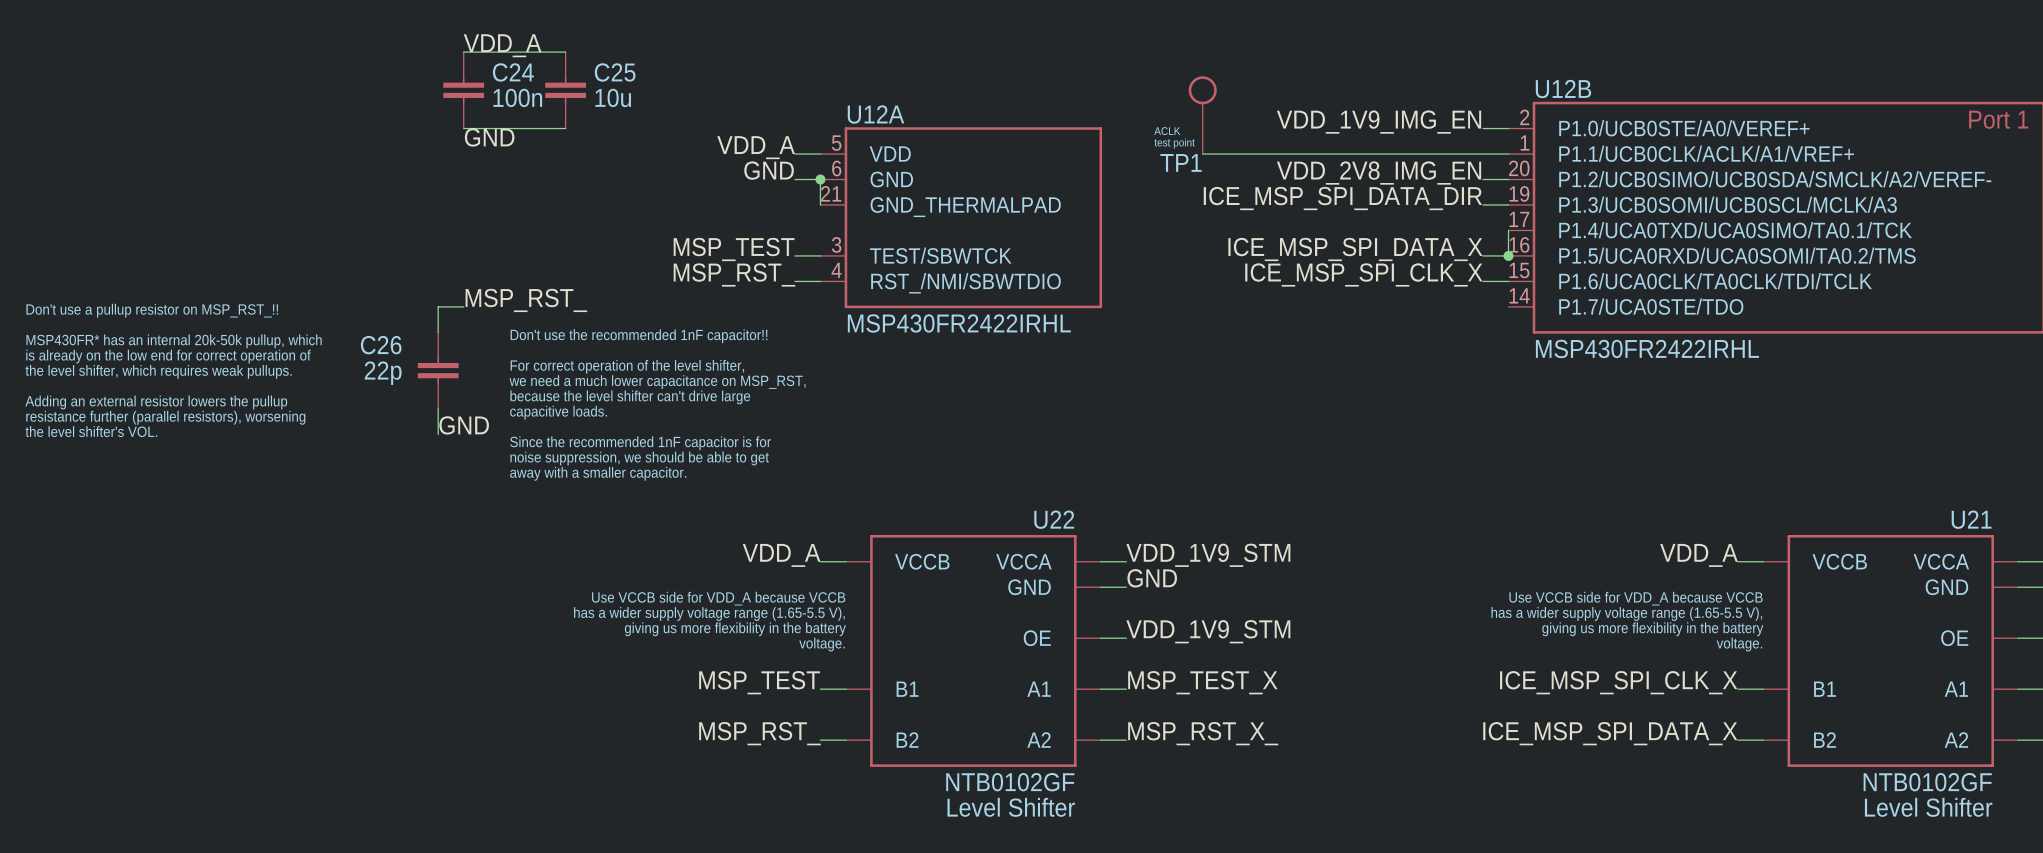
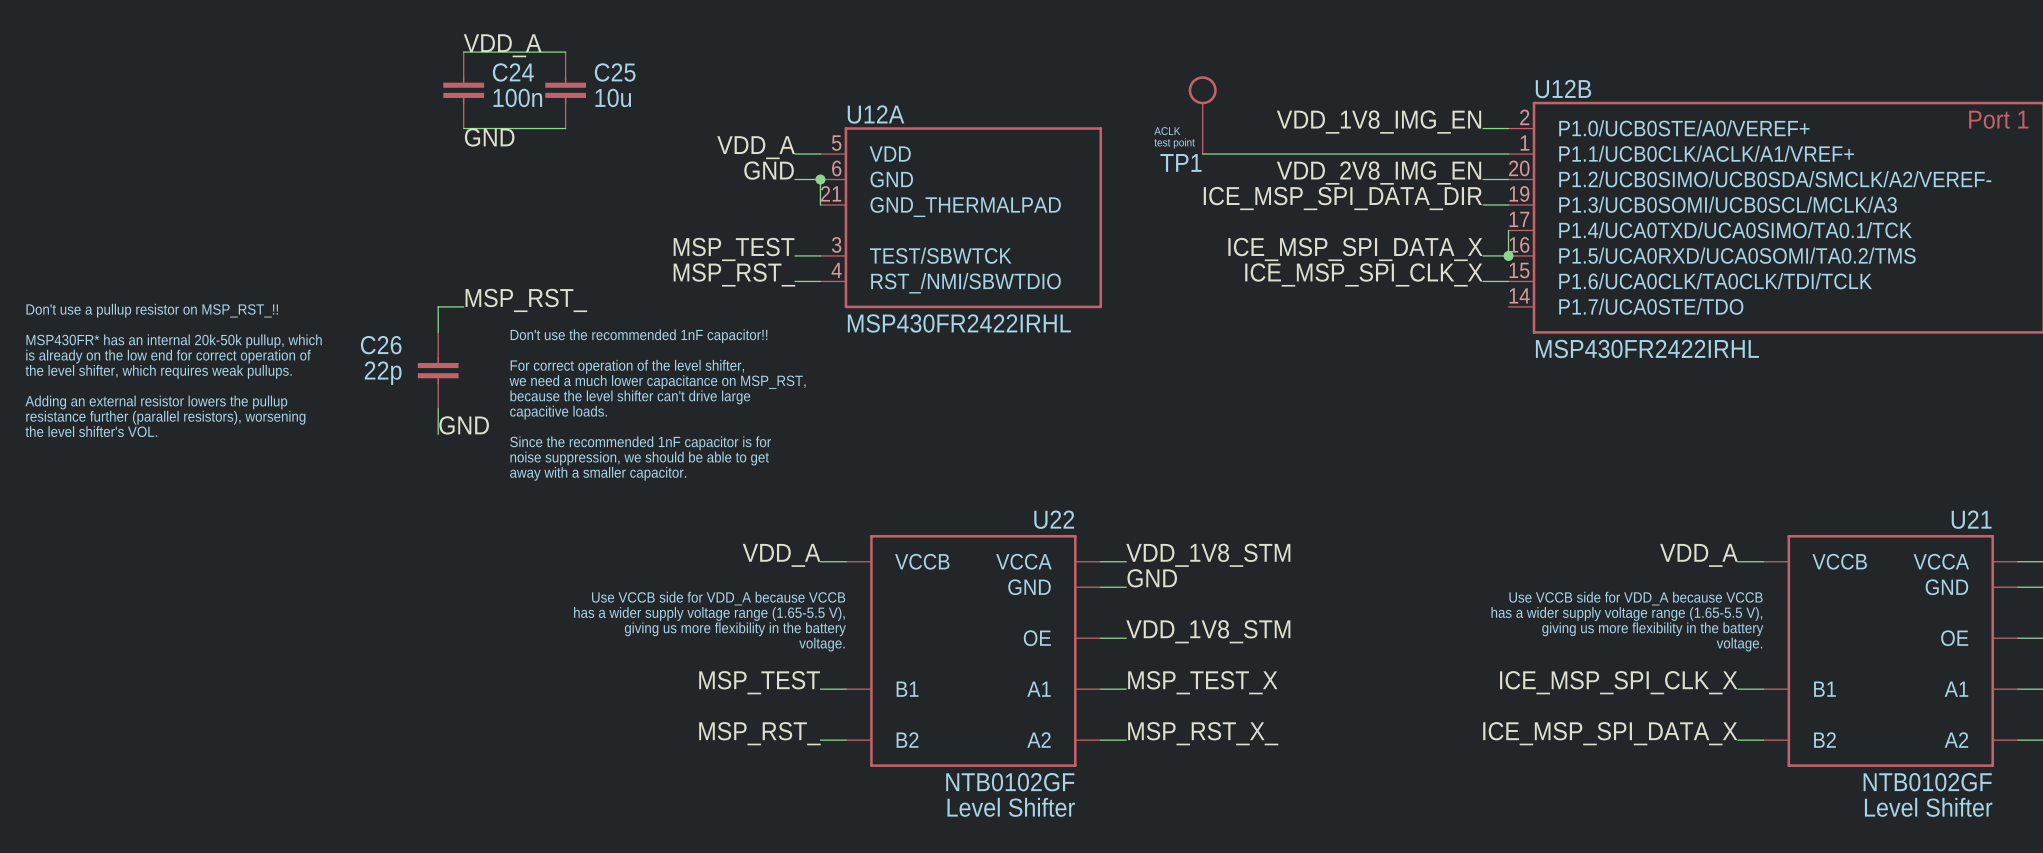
label: VDD_1V9_IMG_EN (1379, 122) -> VDD_1V8_IMG_EN (1379, 122)
label: VDD_1V9_STM (1208, 555) -> VDD_1V8_STM (1208, 555)
label: VDD_1V9_STM (1208, 631) -> VDD_1V8_STM (1208, 631)

